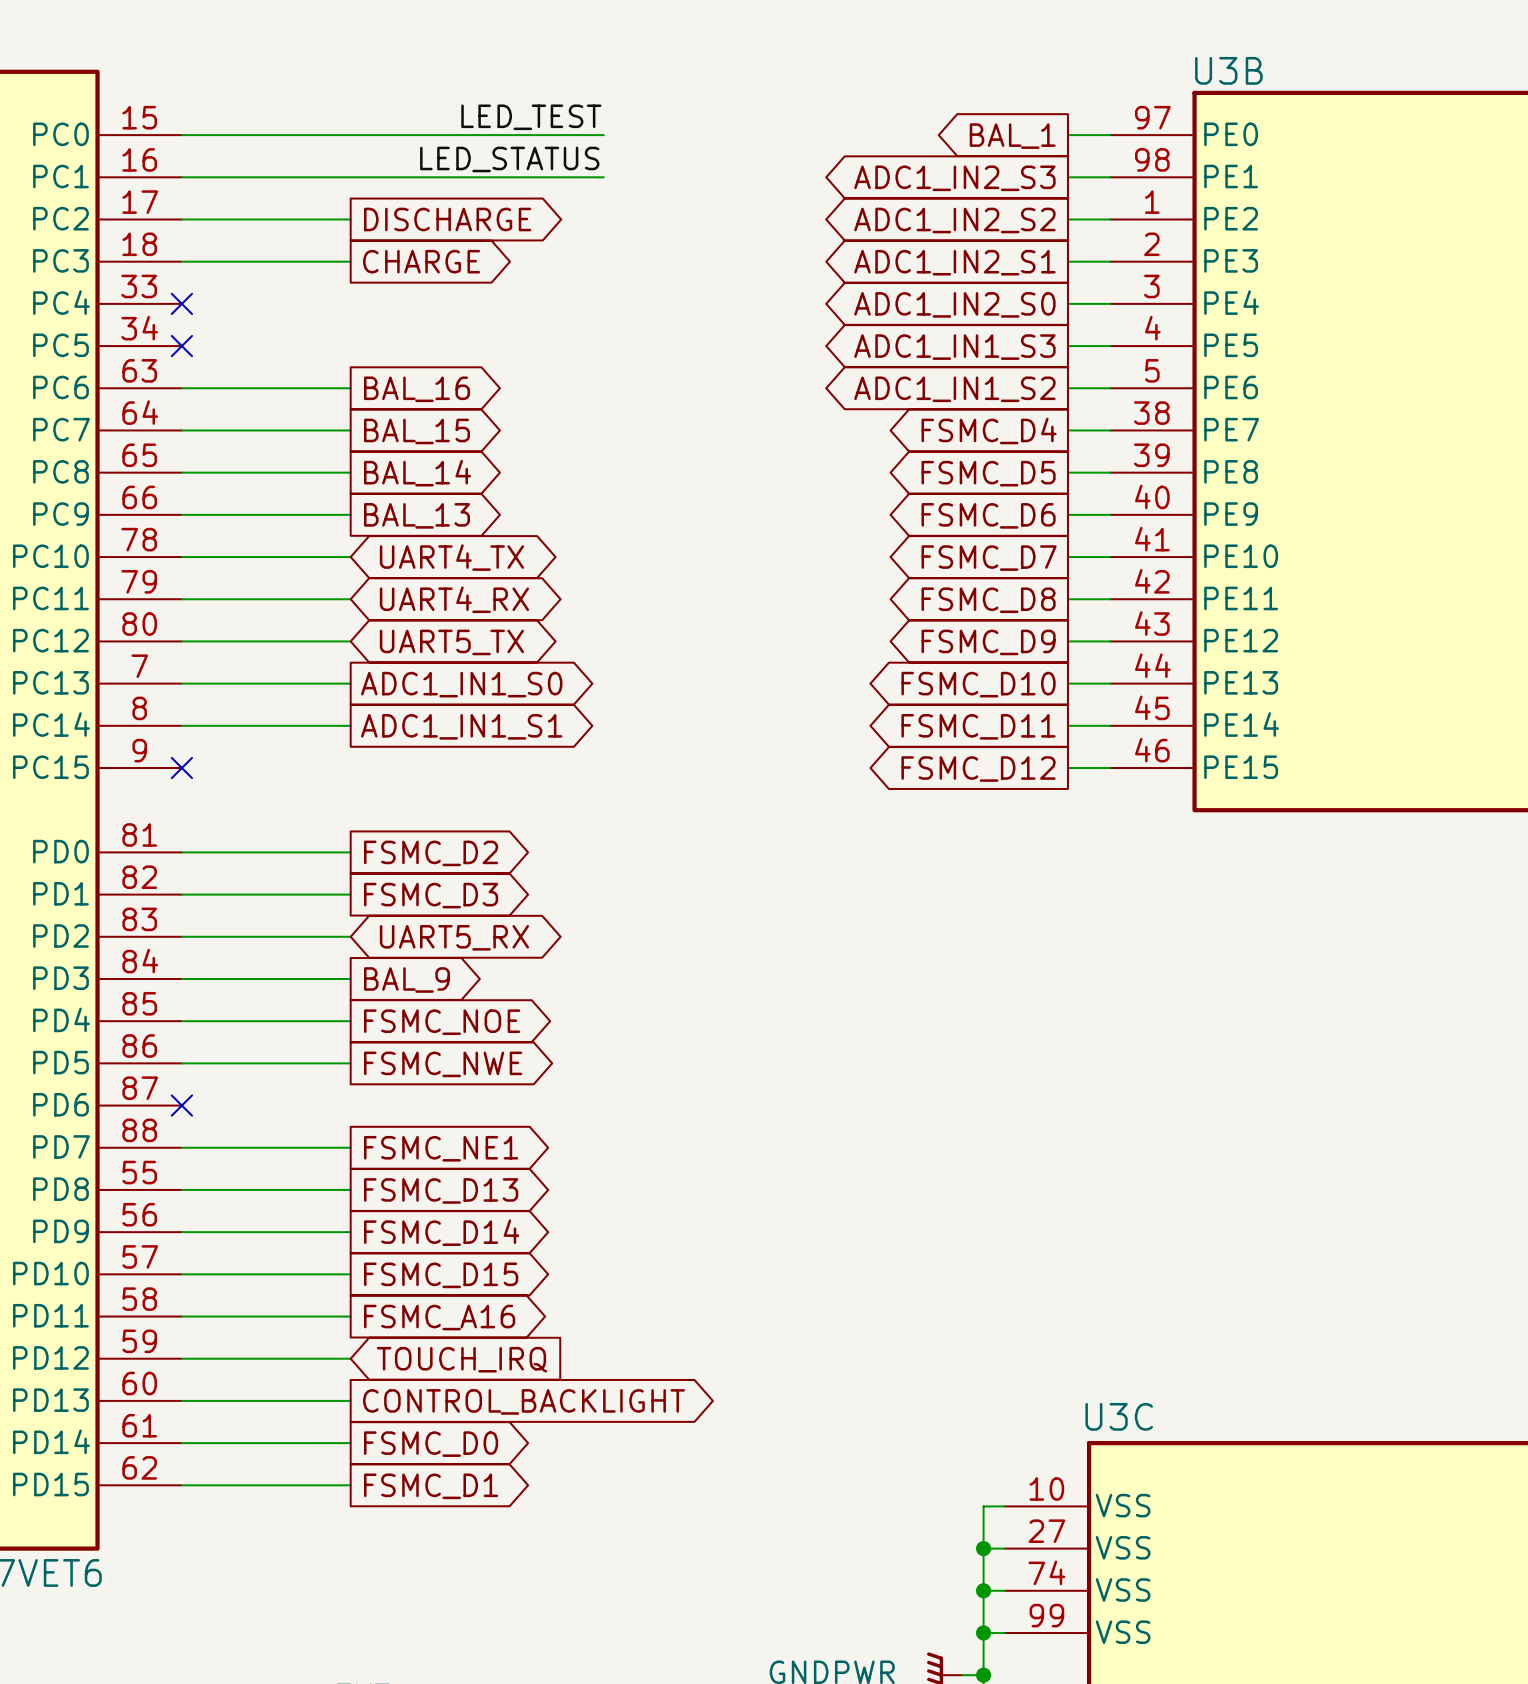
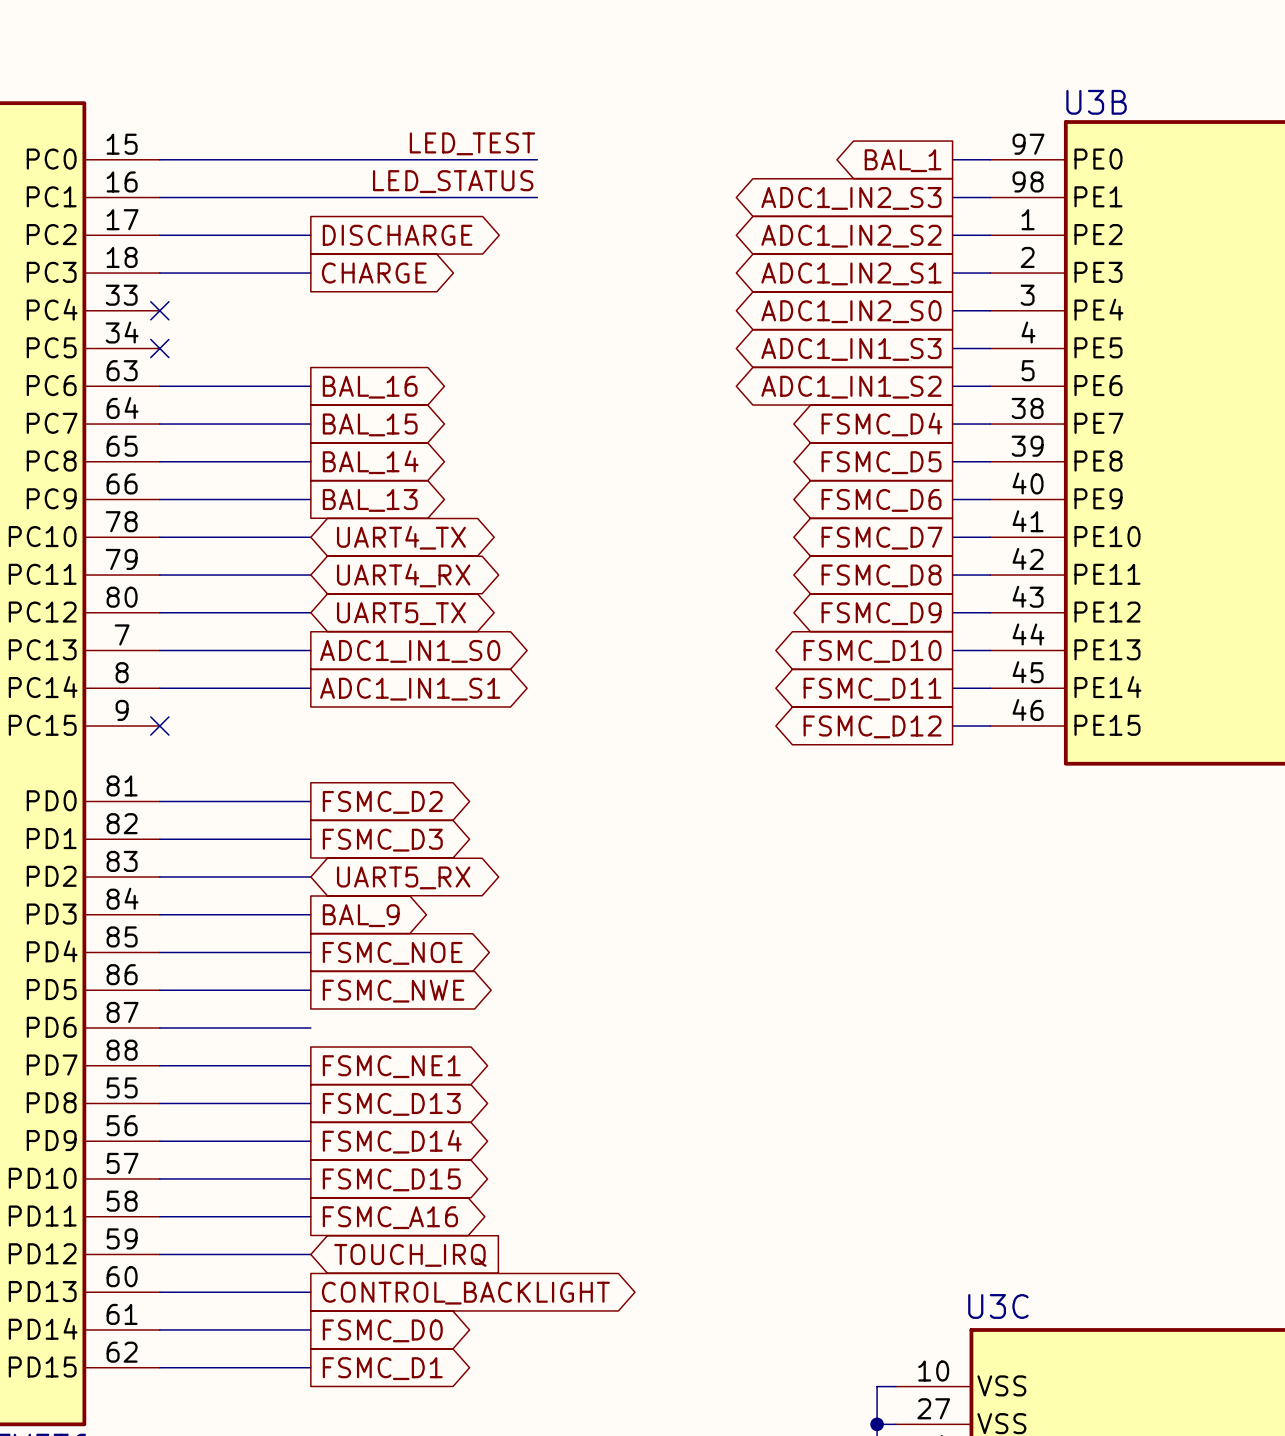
wire: none -> (159, 1027) (310, 1027)
no-connect mark: (181, 1105) -> none

